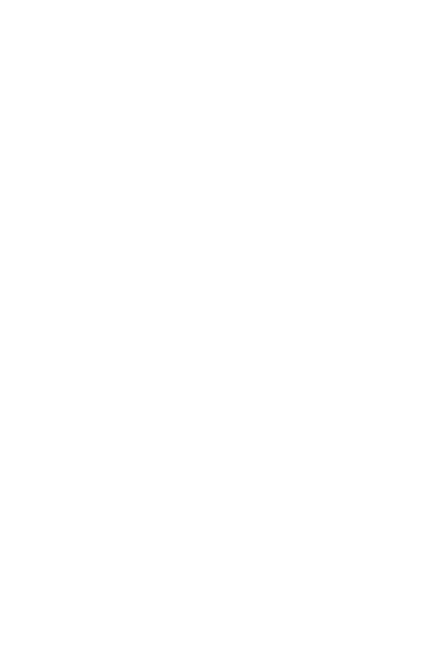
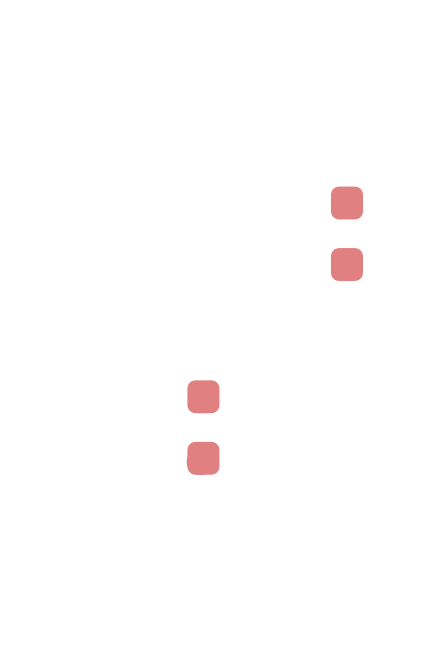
part: none -> (346, 233)
part: none -> (203, 427)

